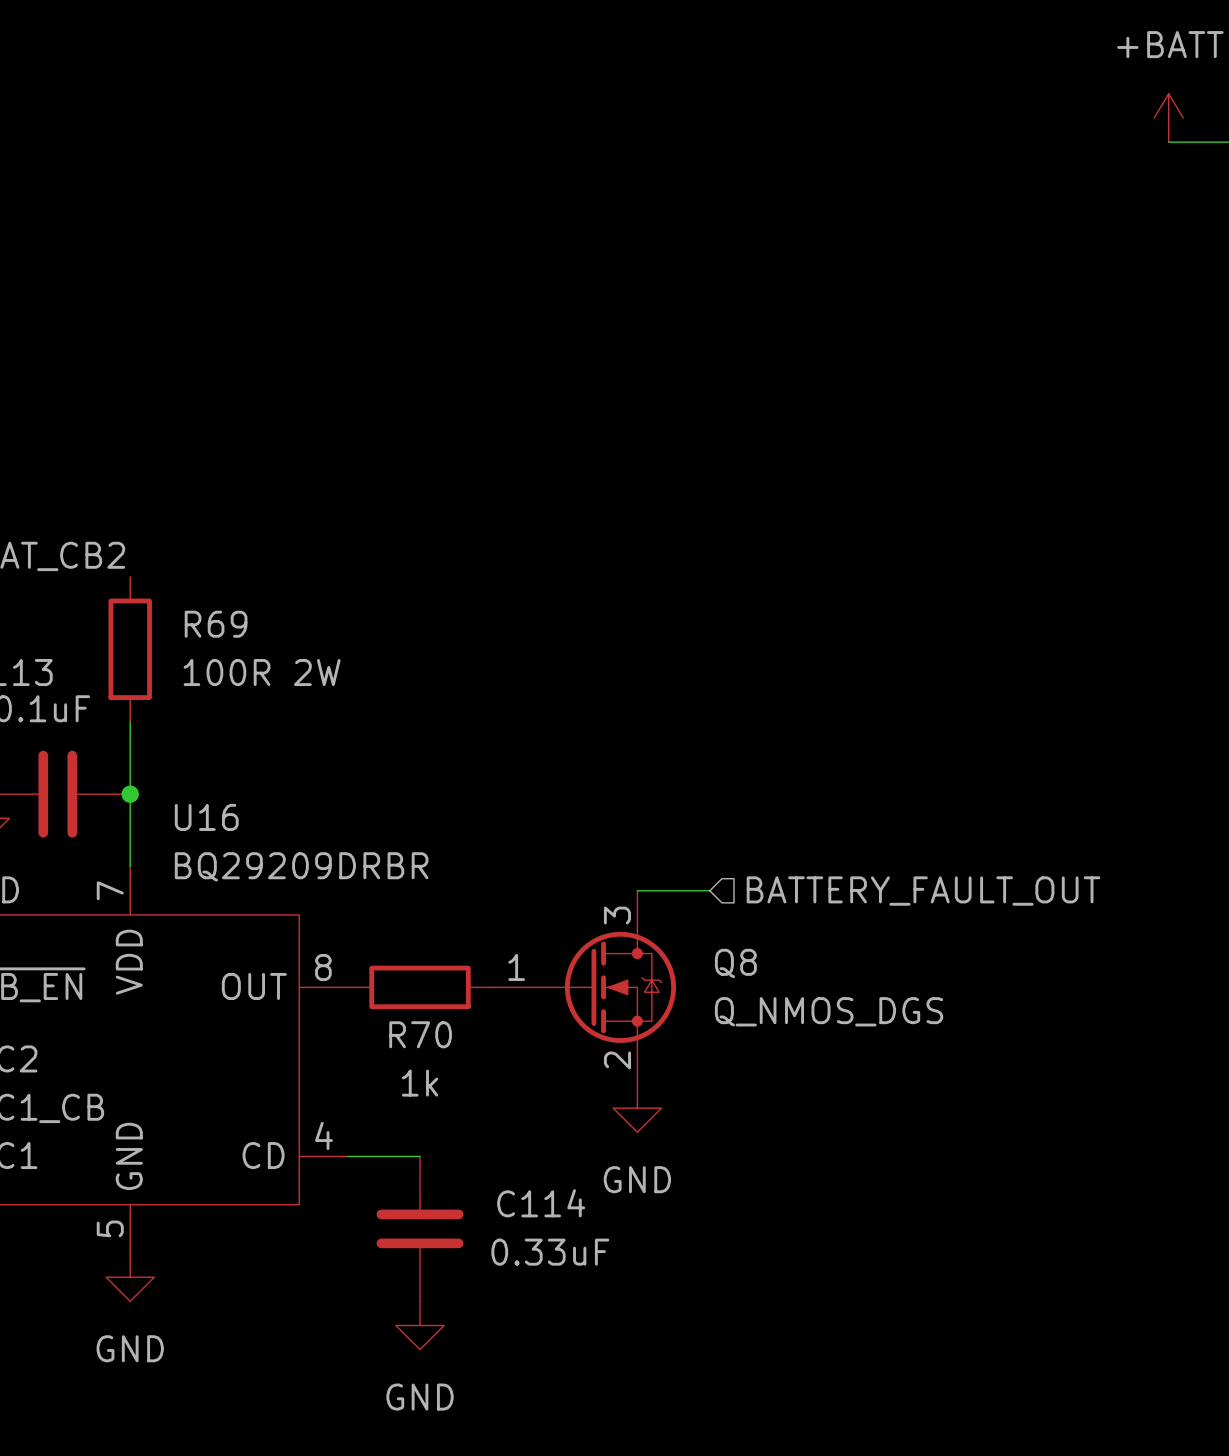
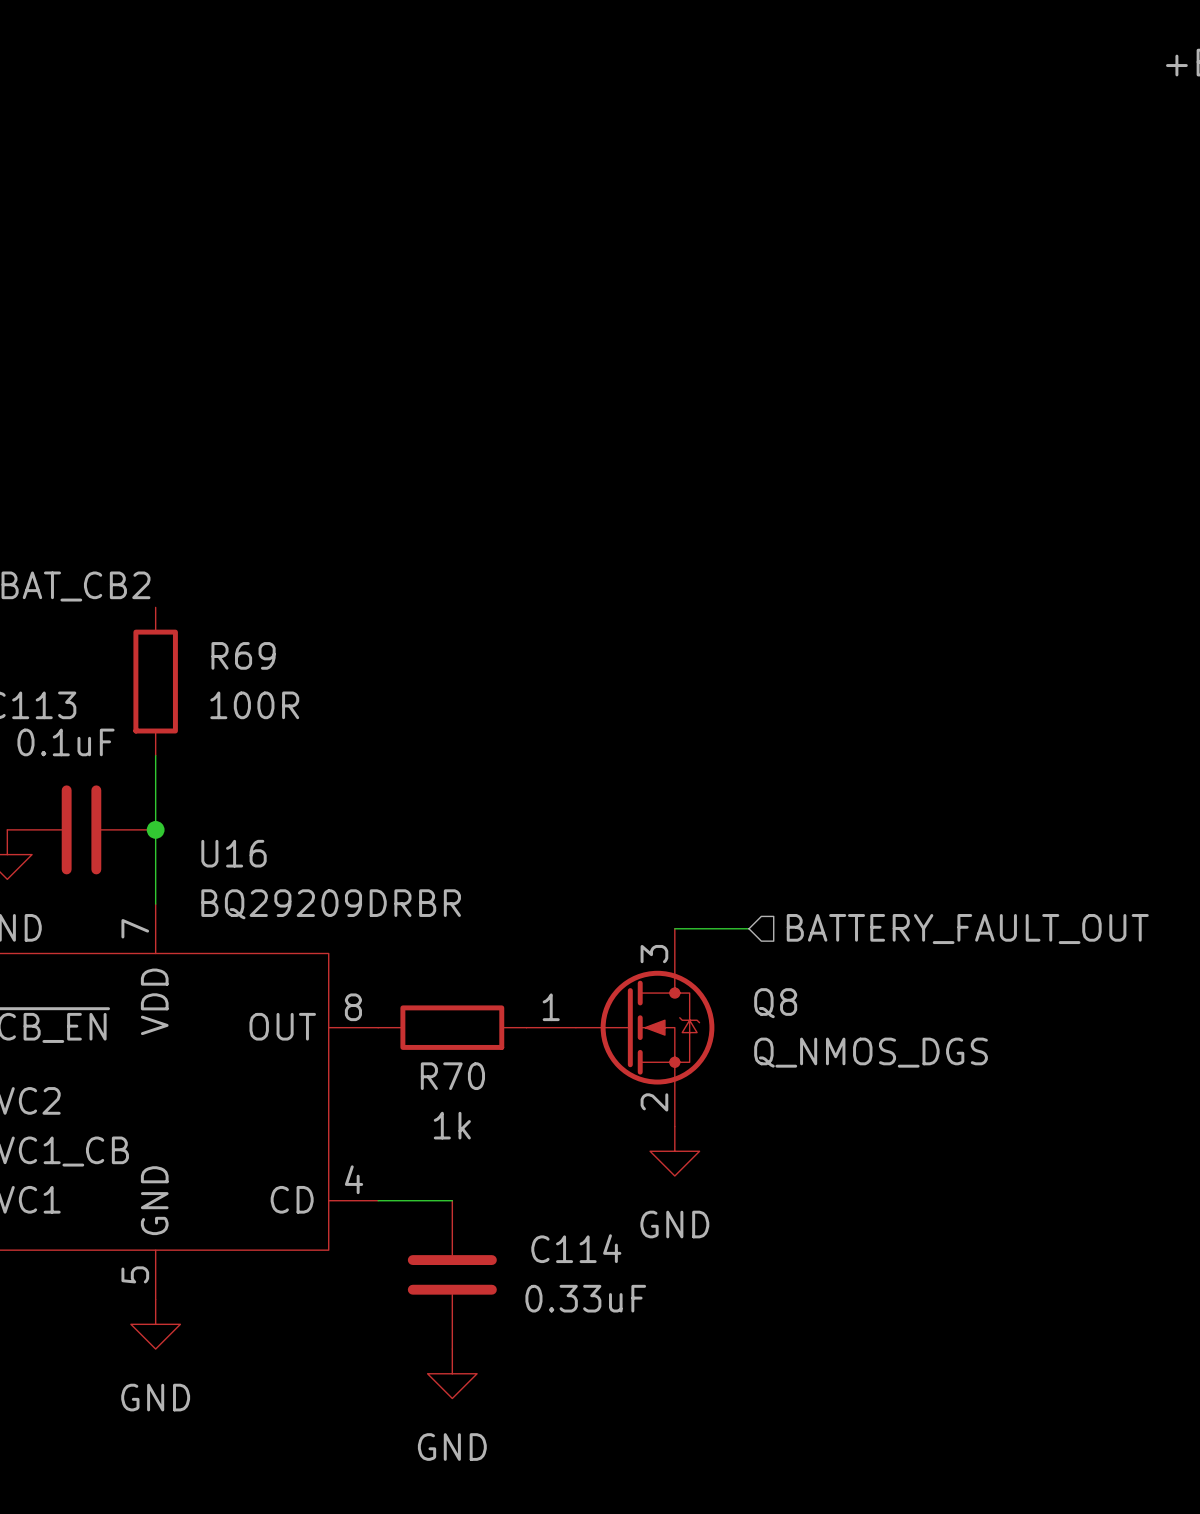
R69 value: 100R 2W (262, 672) -> 100R (254, 705)

